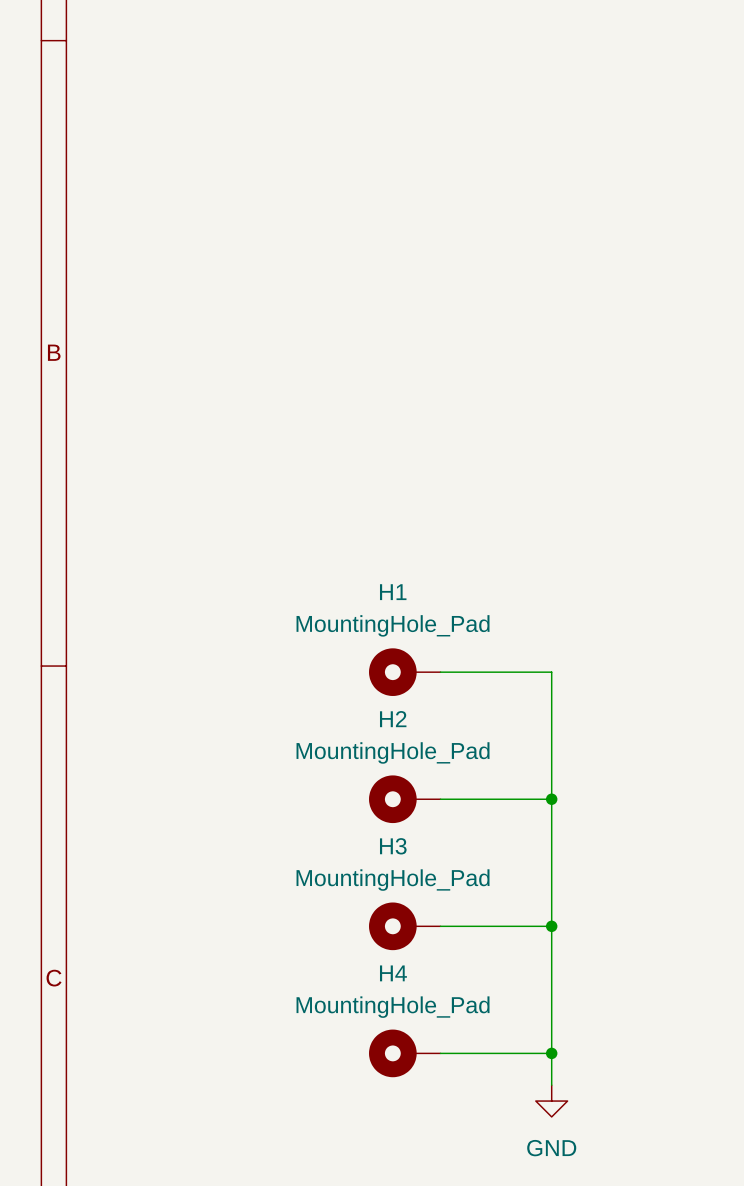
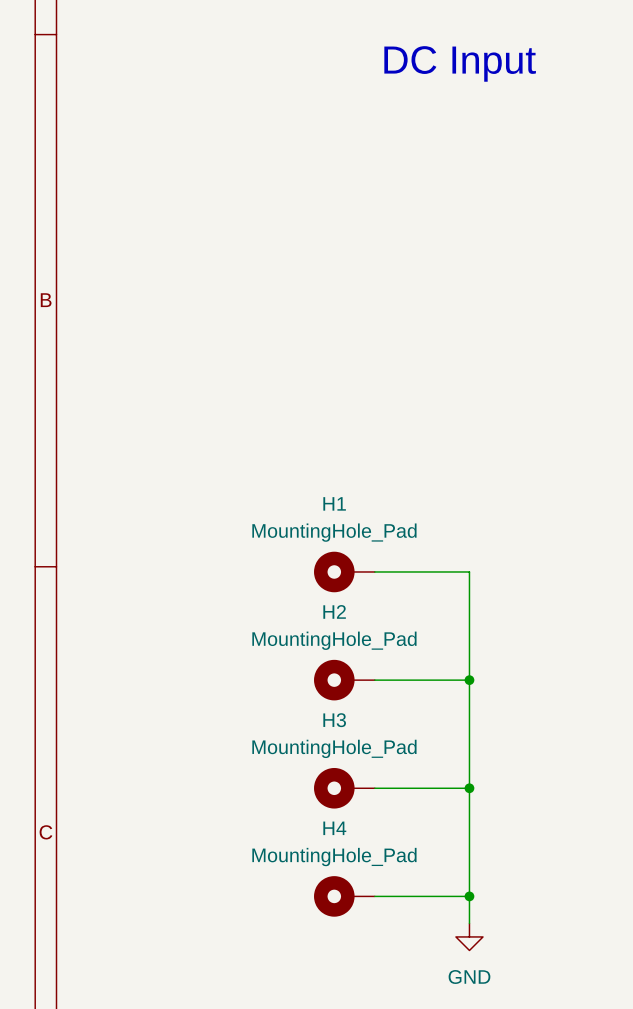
text: none -> DC Input (460, 63)

